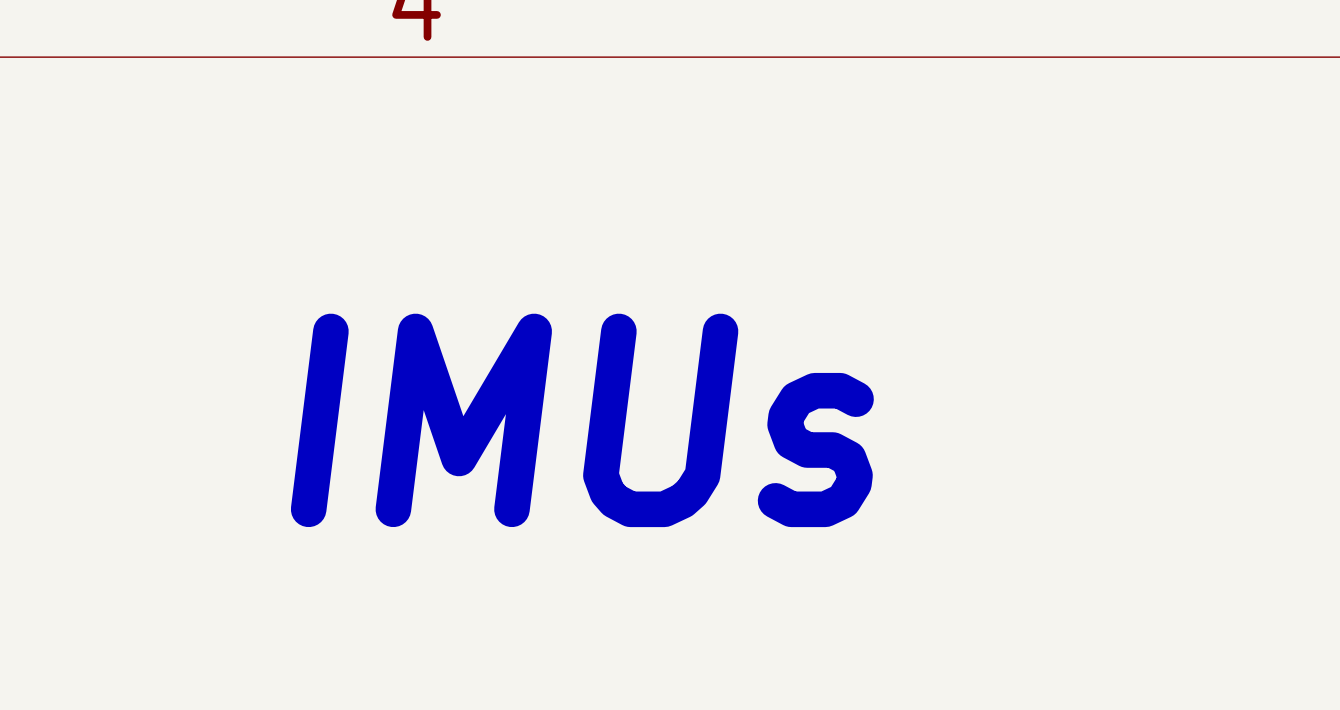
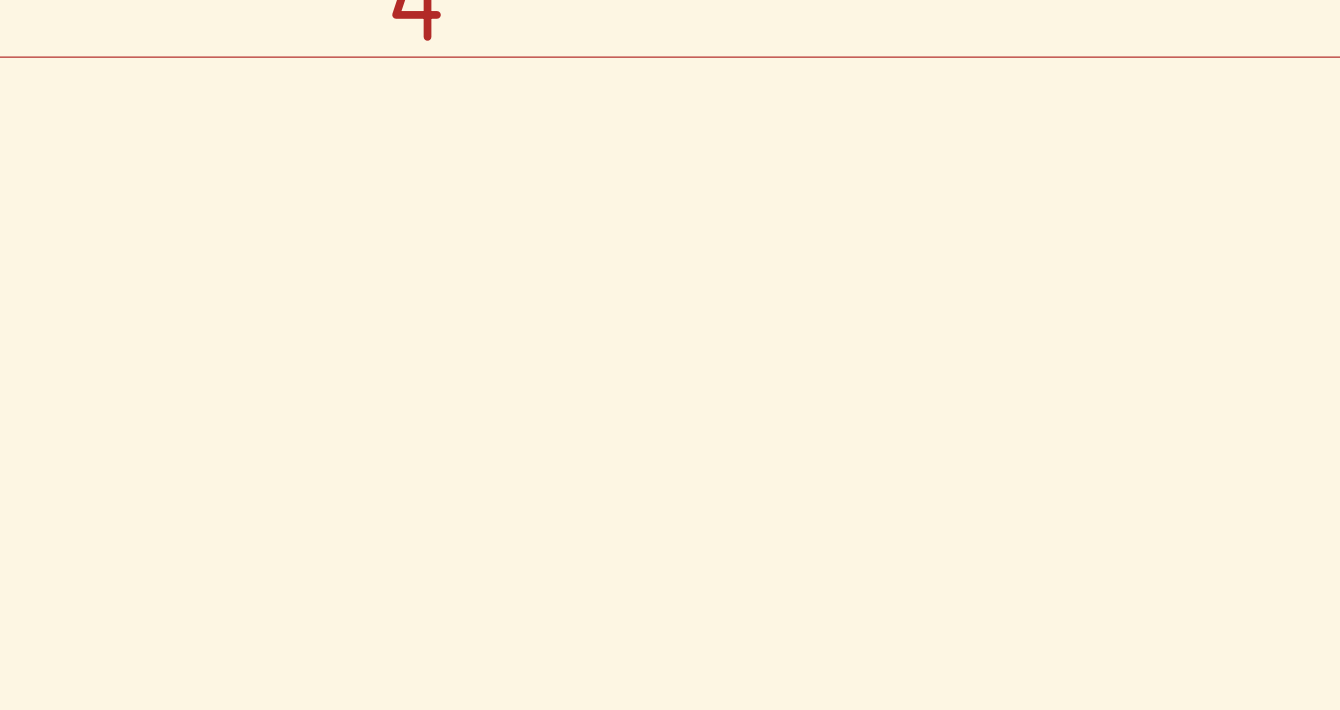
text: IMUs (582, 420) -> none

